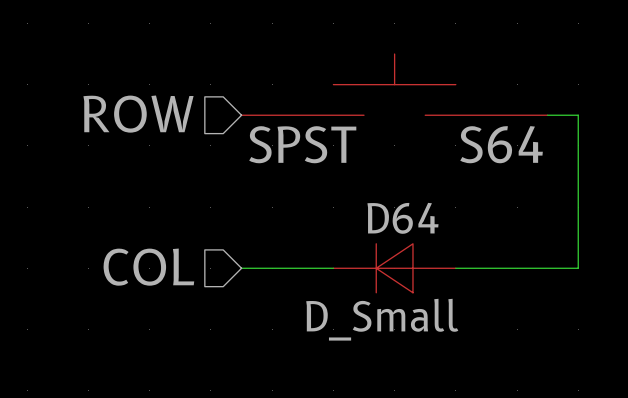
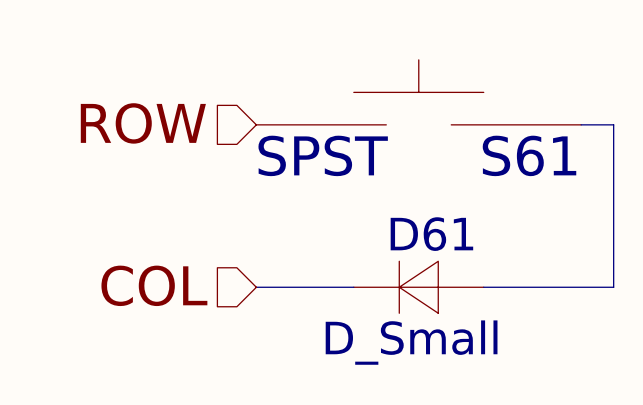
S64 name: S64 (501, 144) -> S61 (529, 155)
D64 name: D64 (402, 218) -> D61 (431, 234)

